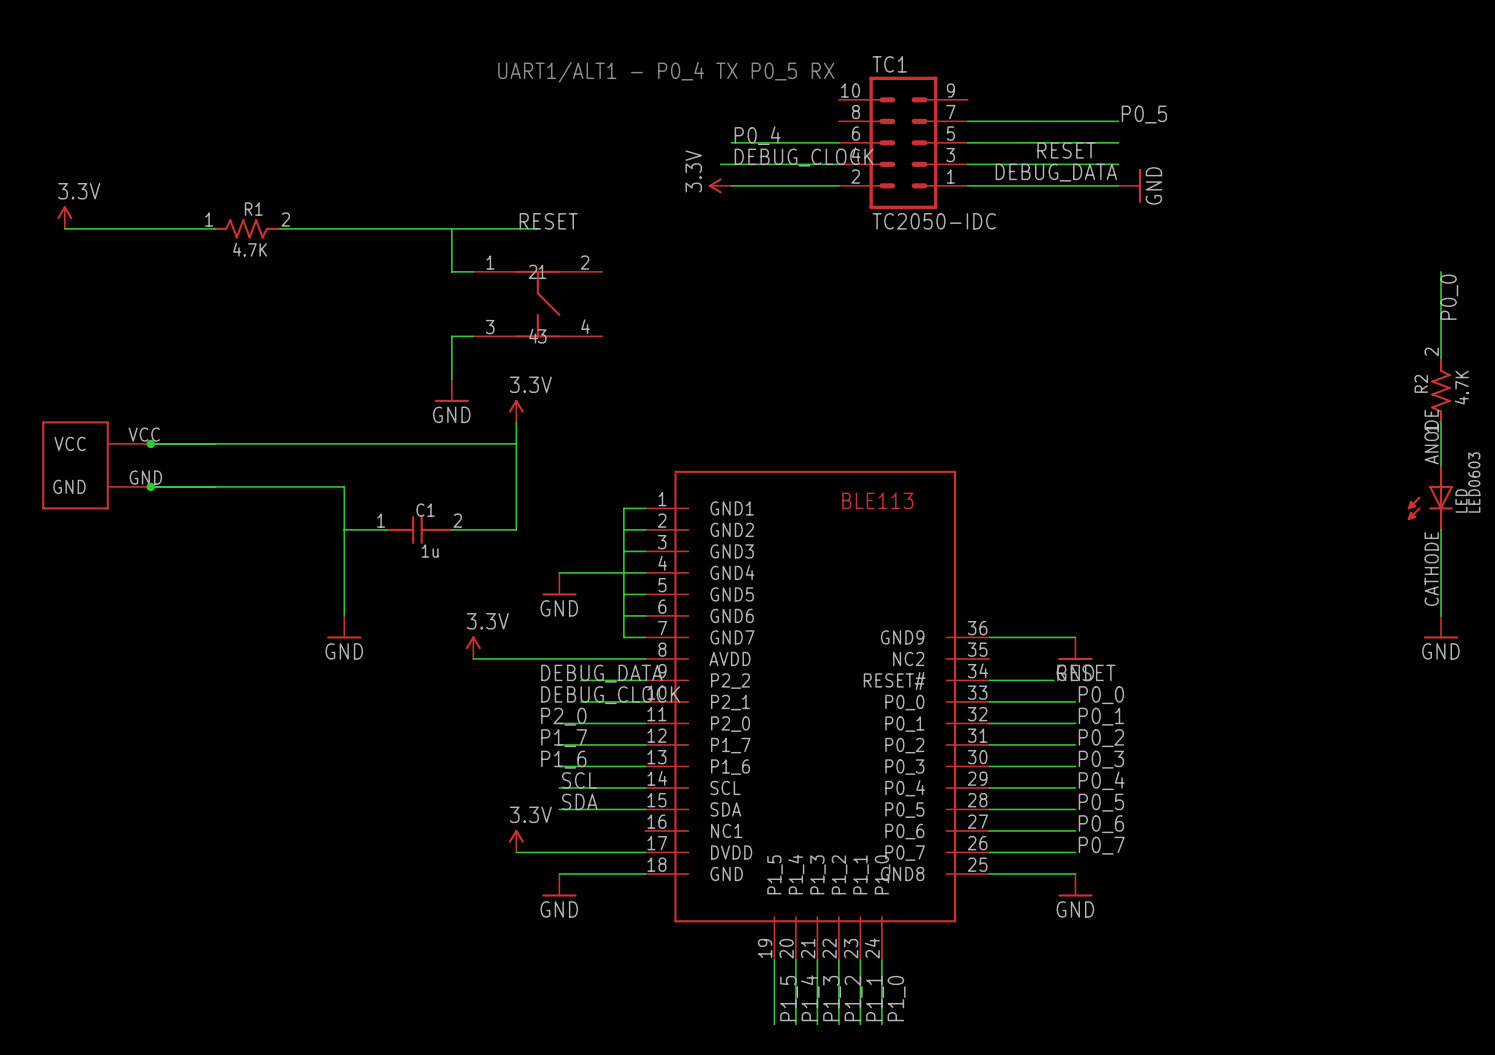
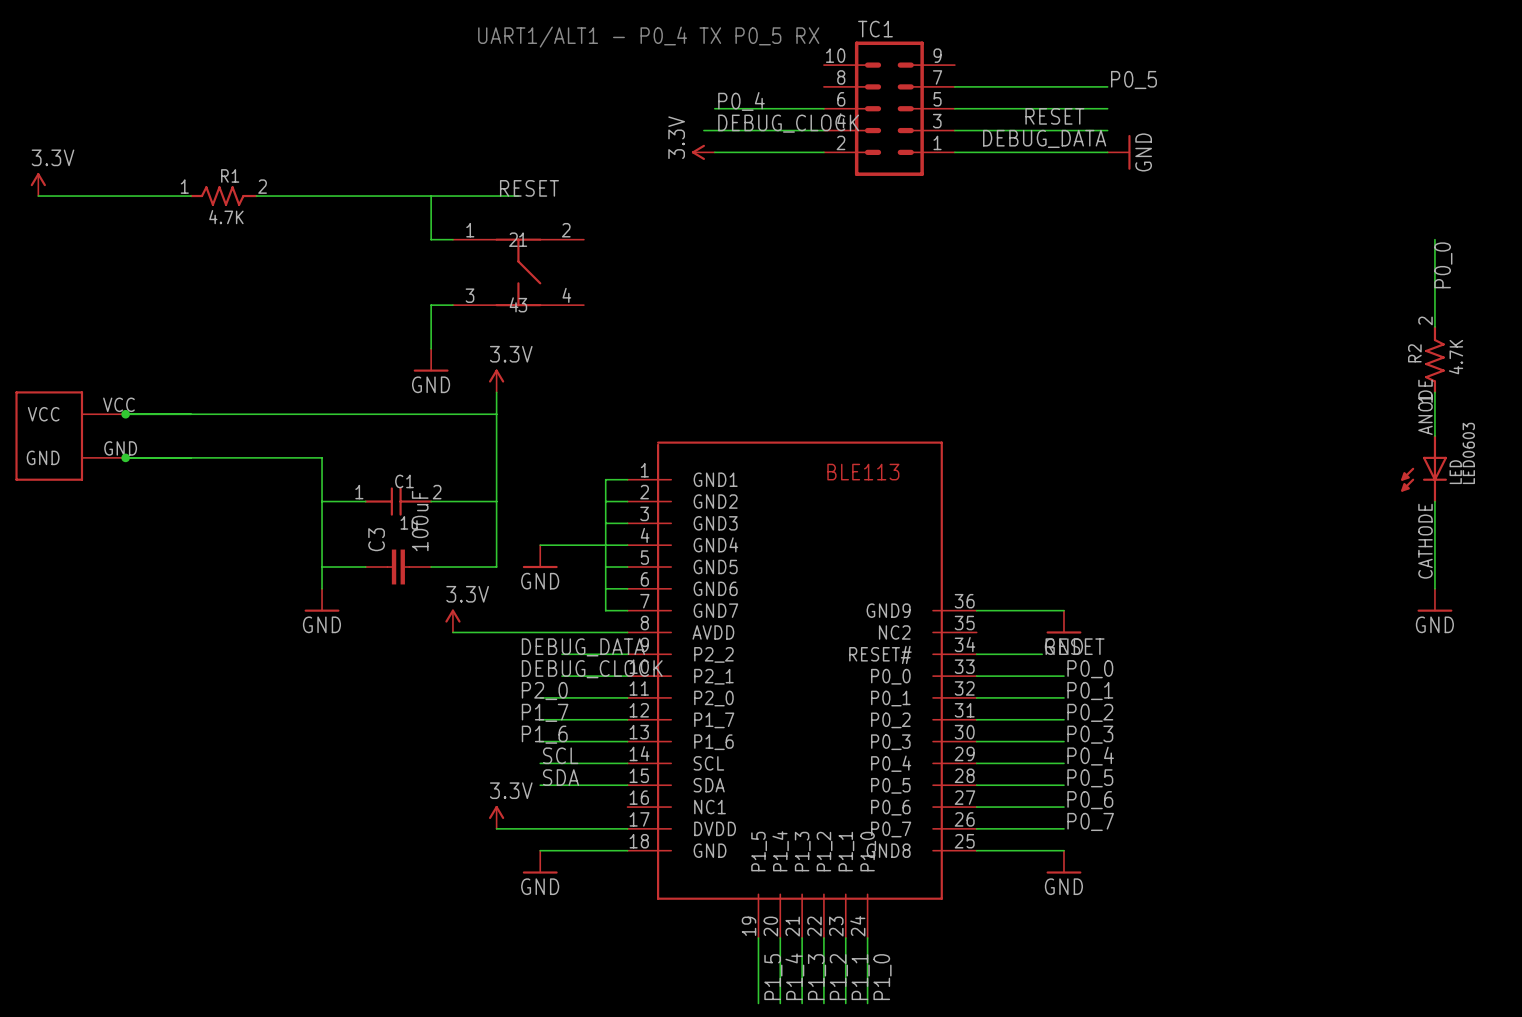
TC1 value: TC2050-IDC (934, 221) -> none
wire: none -> (496, 501) (496, 567) (431, 567)
wire: none -> (322, 567) (365, 567)
C3: none -> 100uF (398, 567)

